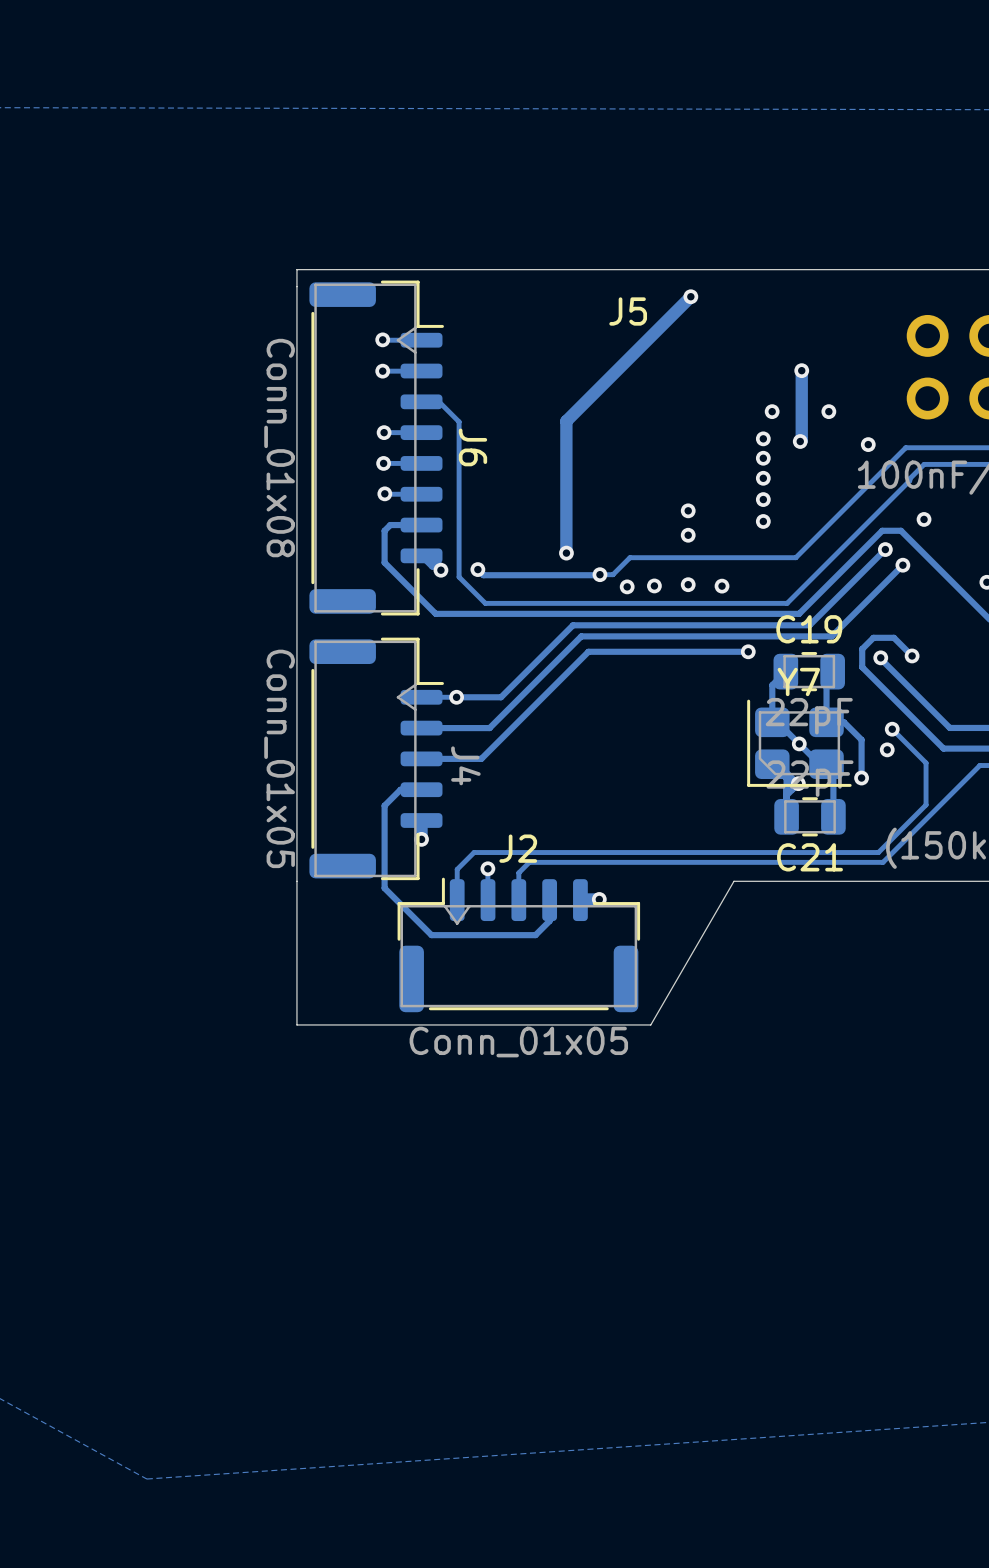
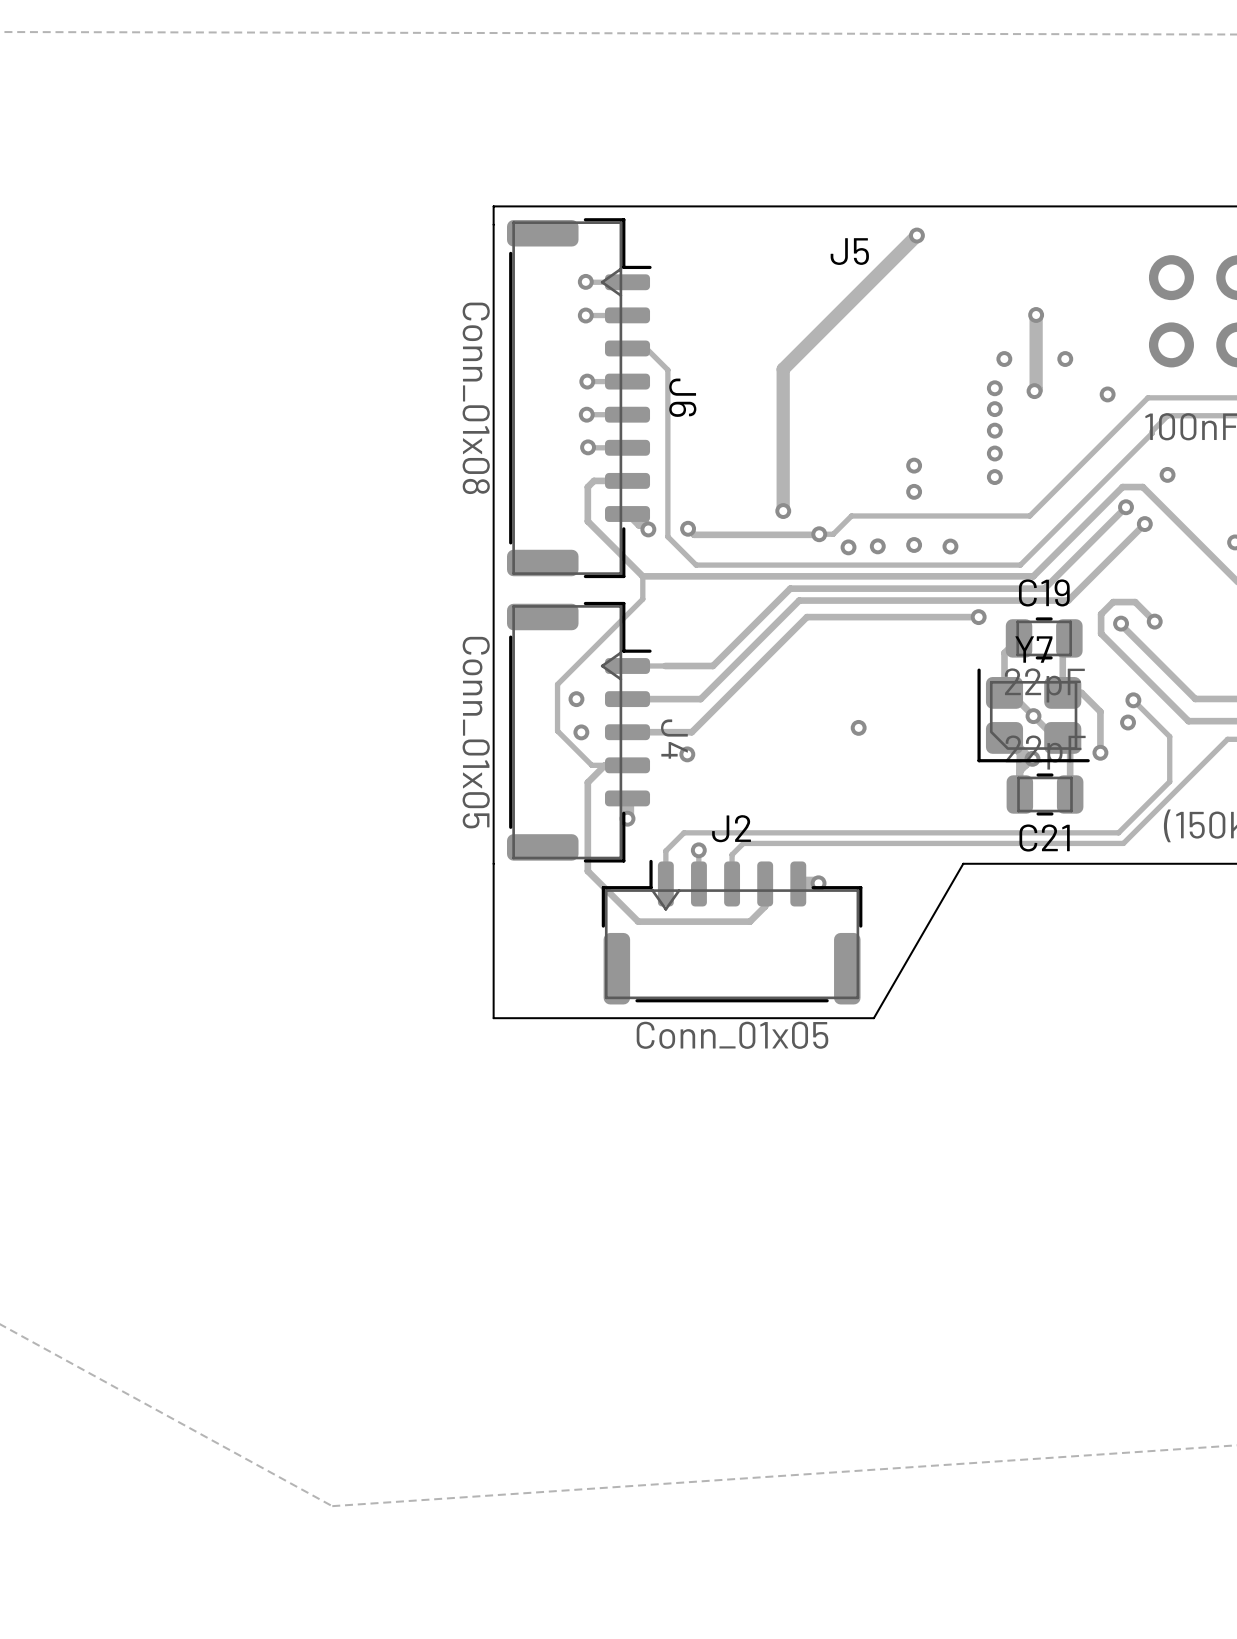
track: none -> (642, 576) (642, 599) (557, 684) (557, 731) (591, 765) (627, 765)
via: (456, 697) -> none
via: none -> (576, 699)
via: none -> (858, 727)
via: none -> (581, 732)
via: none -> (687, 754)

